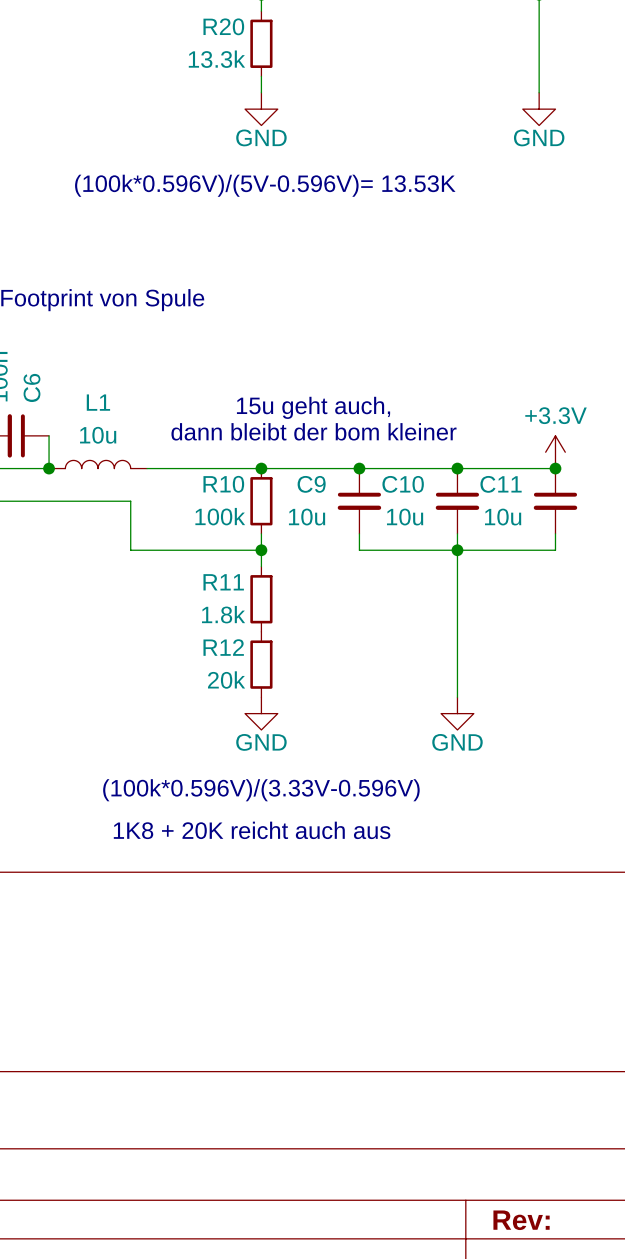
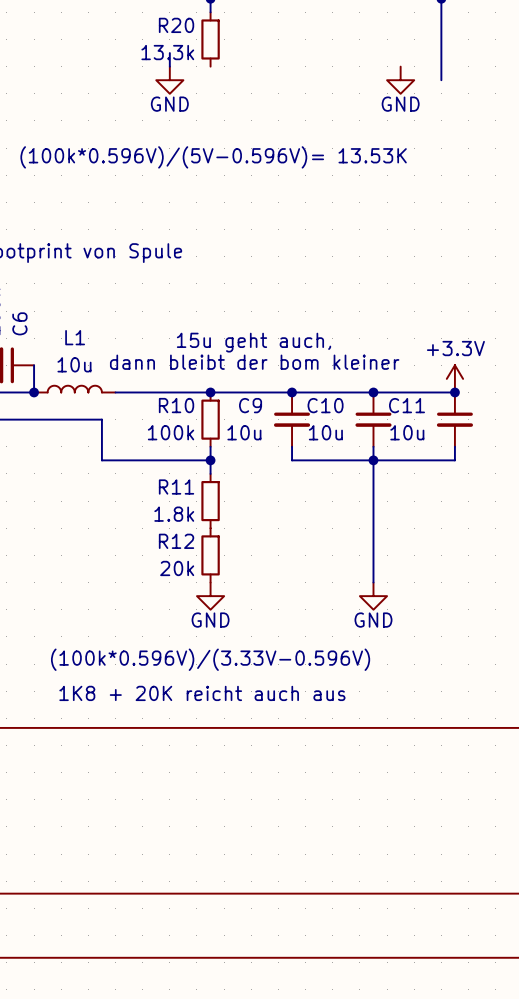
wire: (261, 76) (261, 92) -> (169, 53) (169, 66)
power symbol position: GND (261, 109) -> GND (169, 80)
power symbol position: GND (539, 109) -> GND (400, 80)

